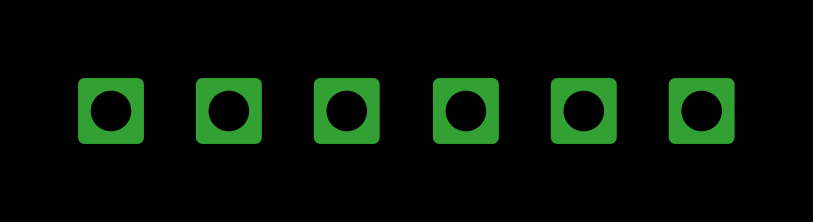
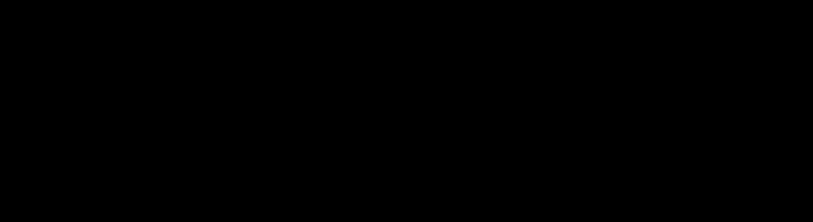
part: (110, 110) -> none
part: (228, 110) -> none
part: (346, 110) -> none
part: (465, 110) -> none
part: (583, 110) -> none
part: (701, 110) -> none

